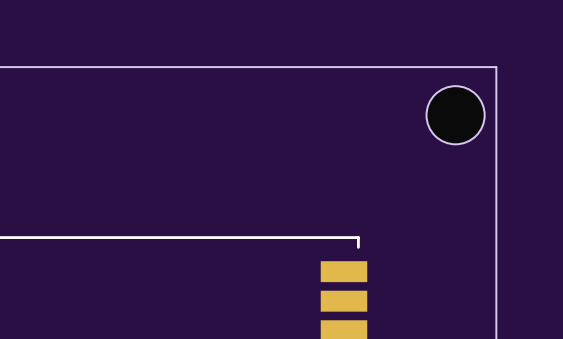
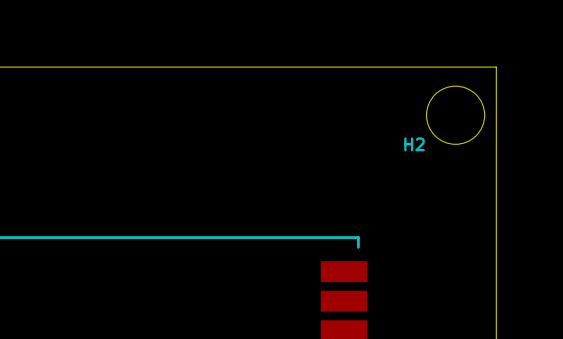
H2 name: none -> H2 (414, 144)

